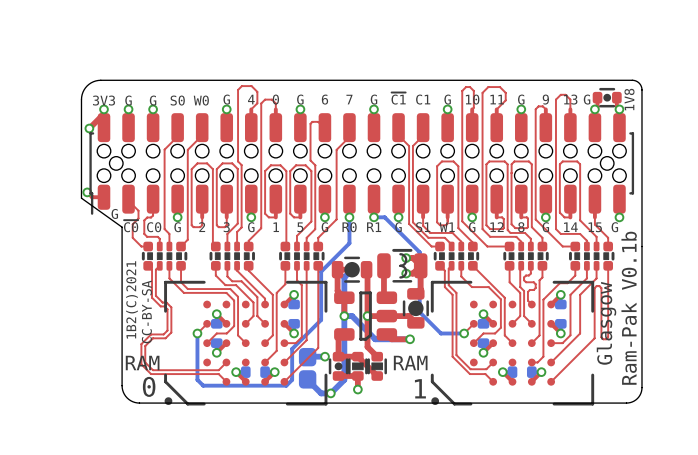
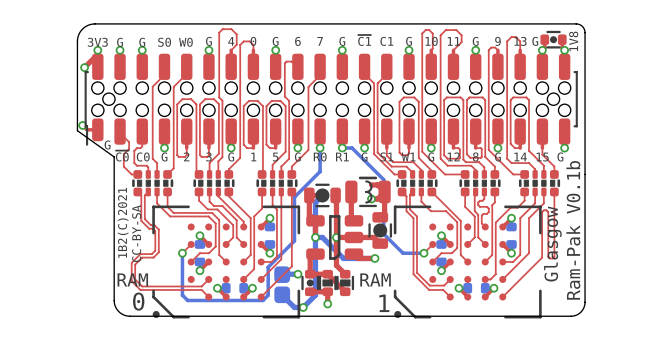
via: (406, 258) -> none

